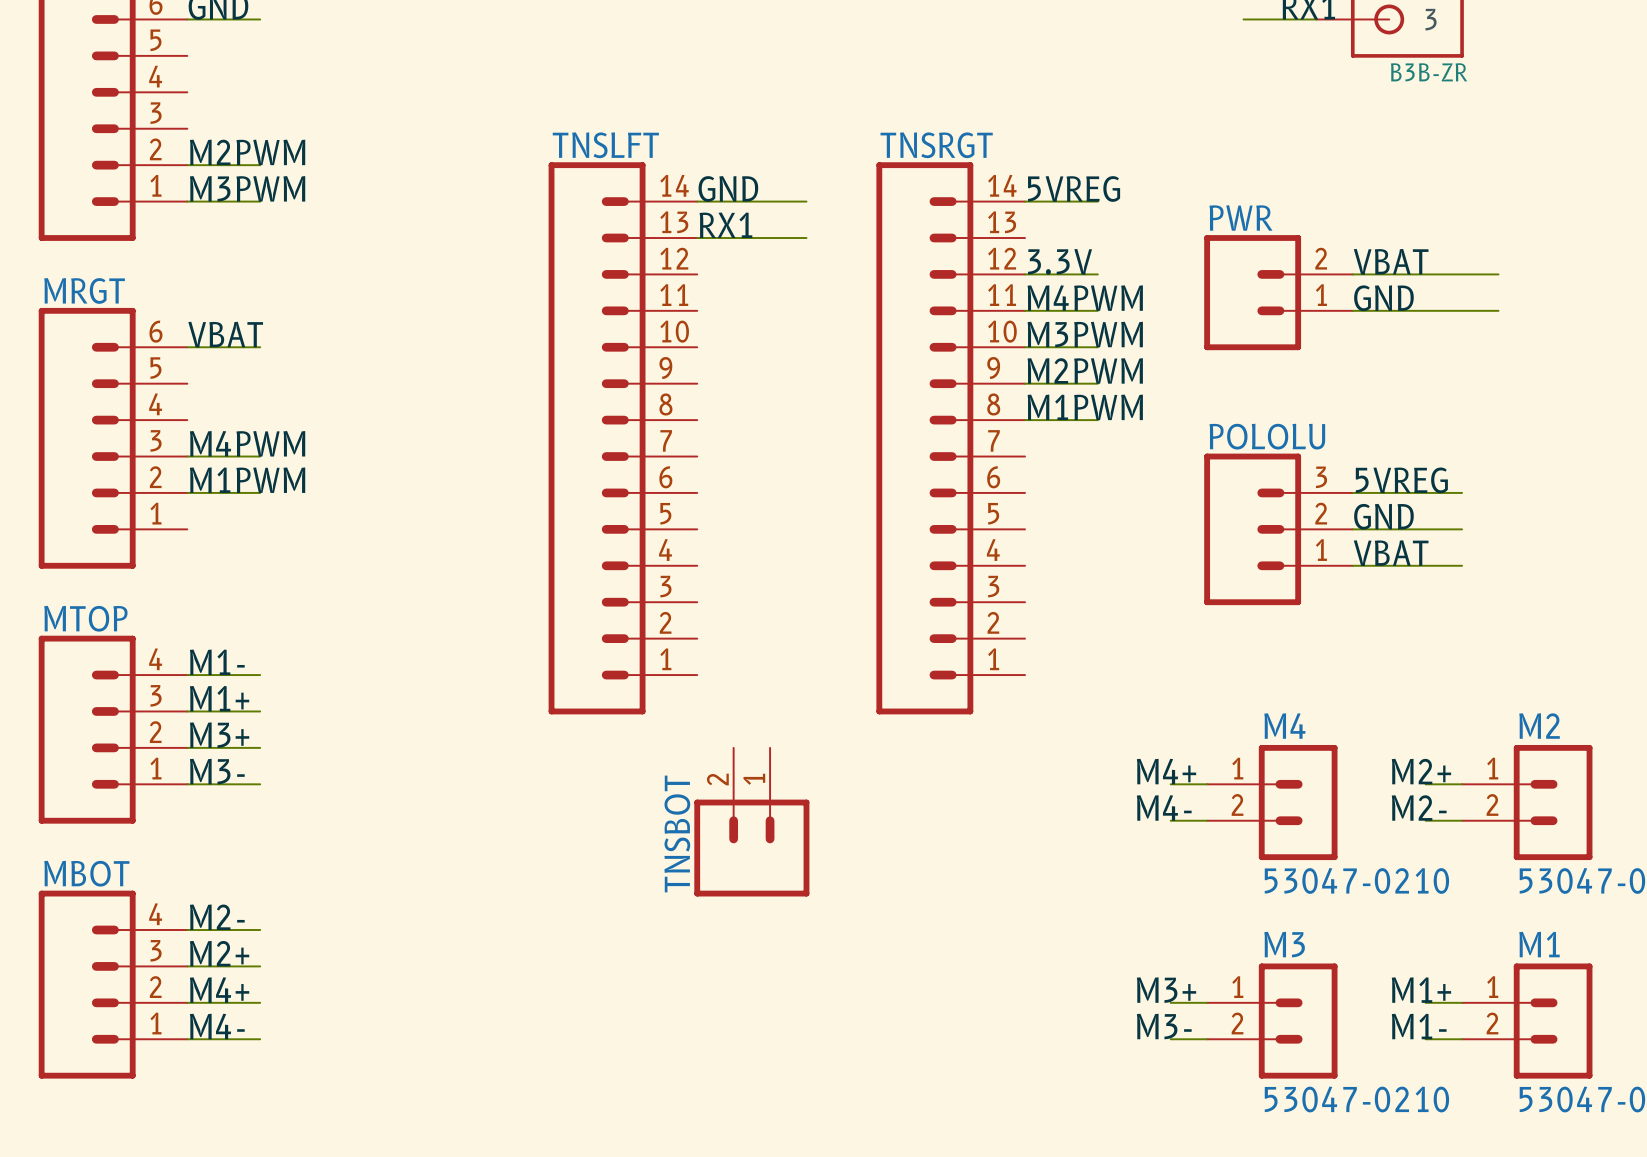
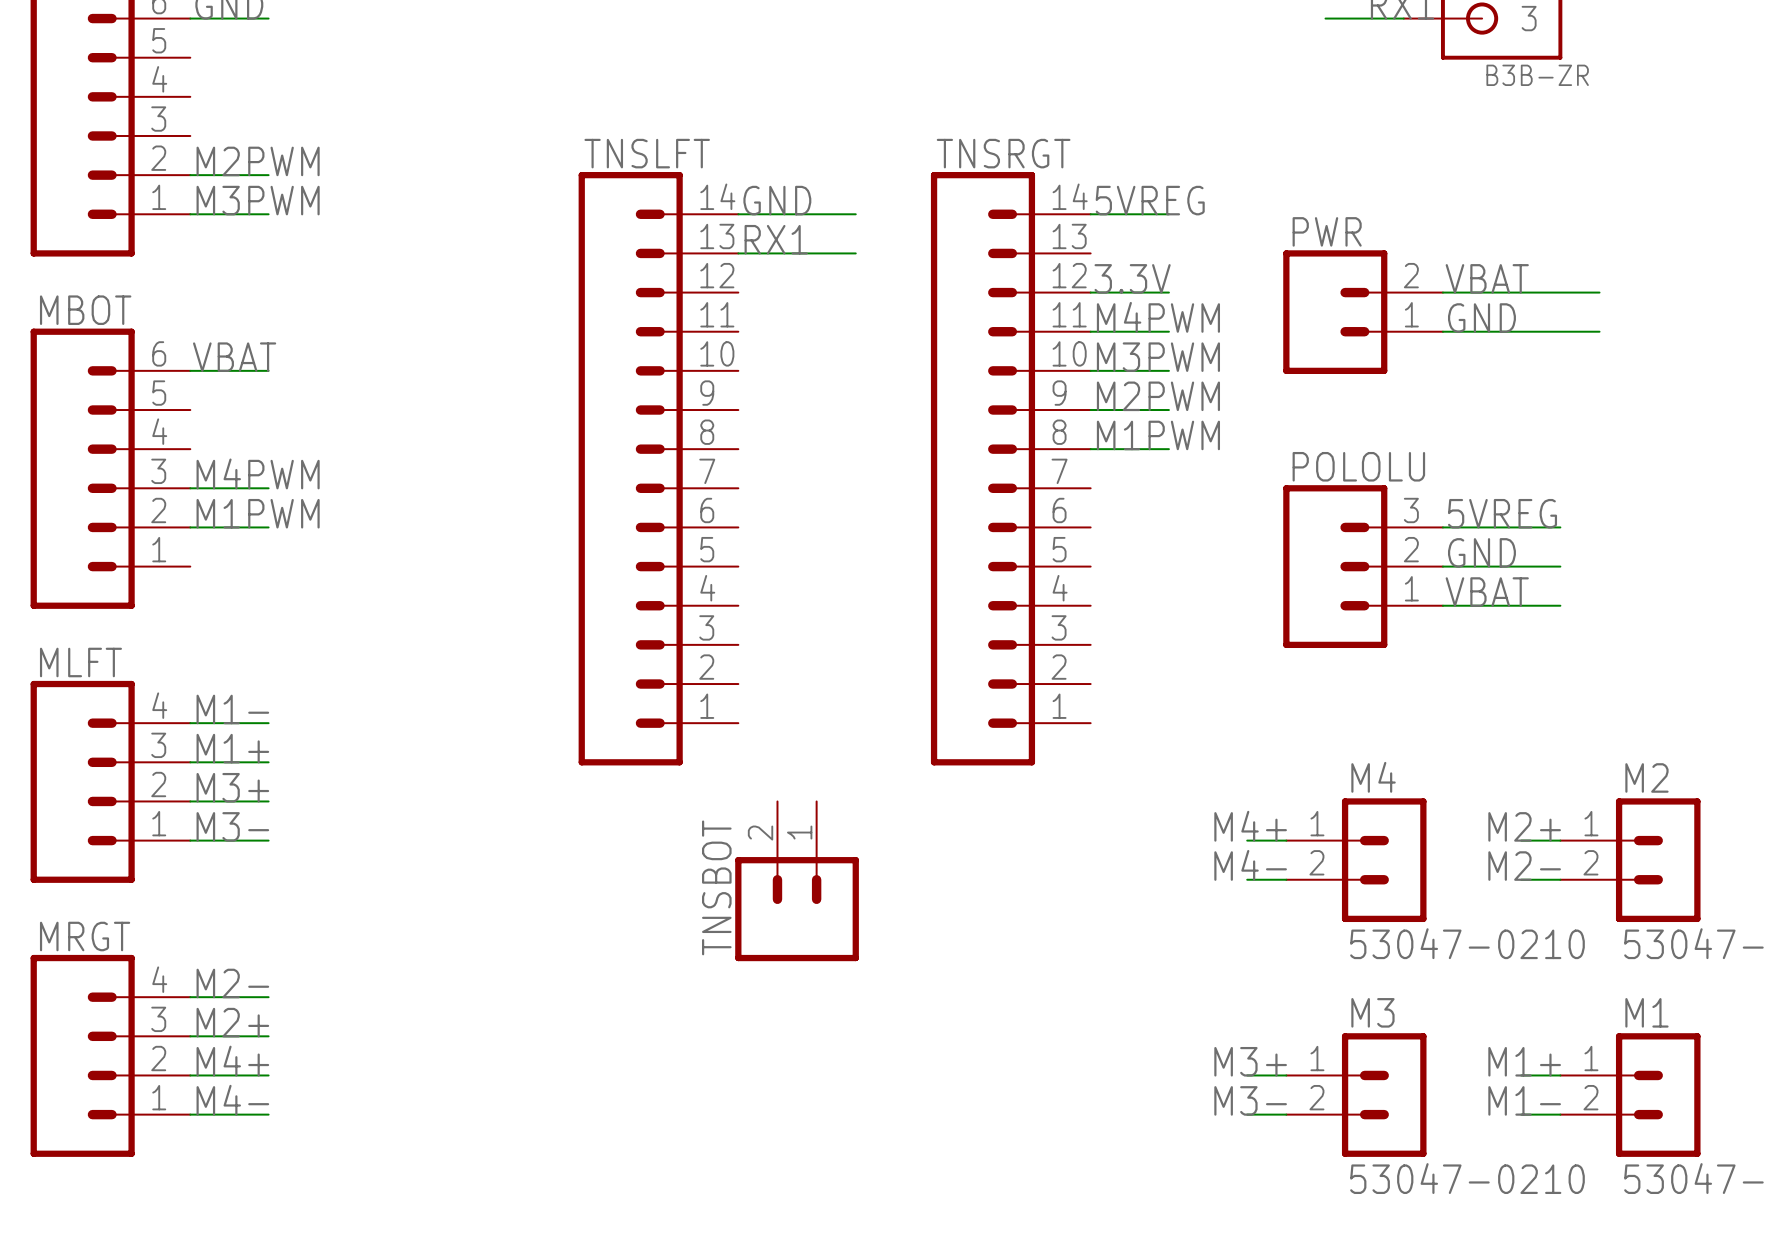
MRGT name: MRGT (84, 290) -> MBOT (85, 310)
MTOP name: MTOP (85, 618) -> MLFT (80, 662)
MBOT name: MBOT (86, 873) -> MRGT (85, 936)

